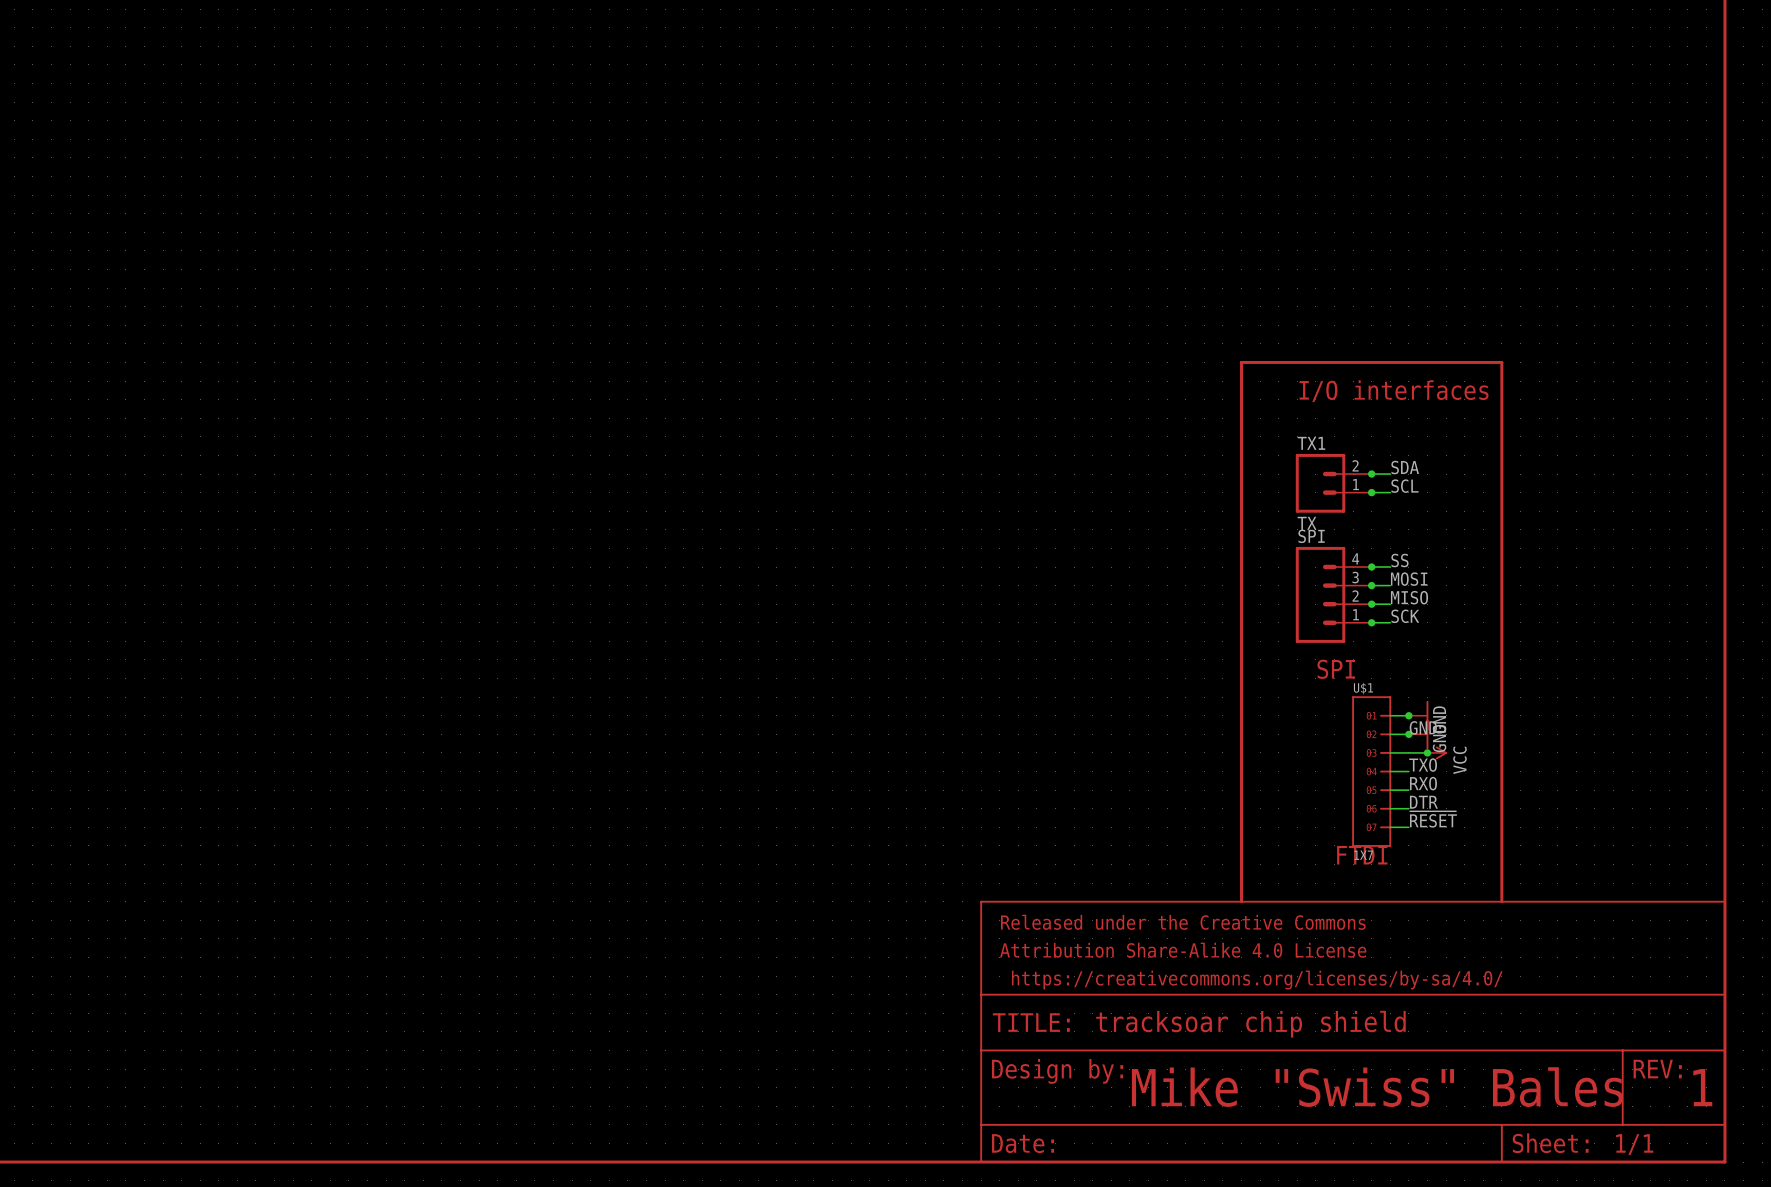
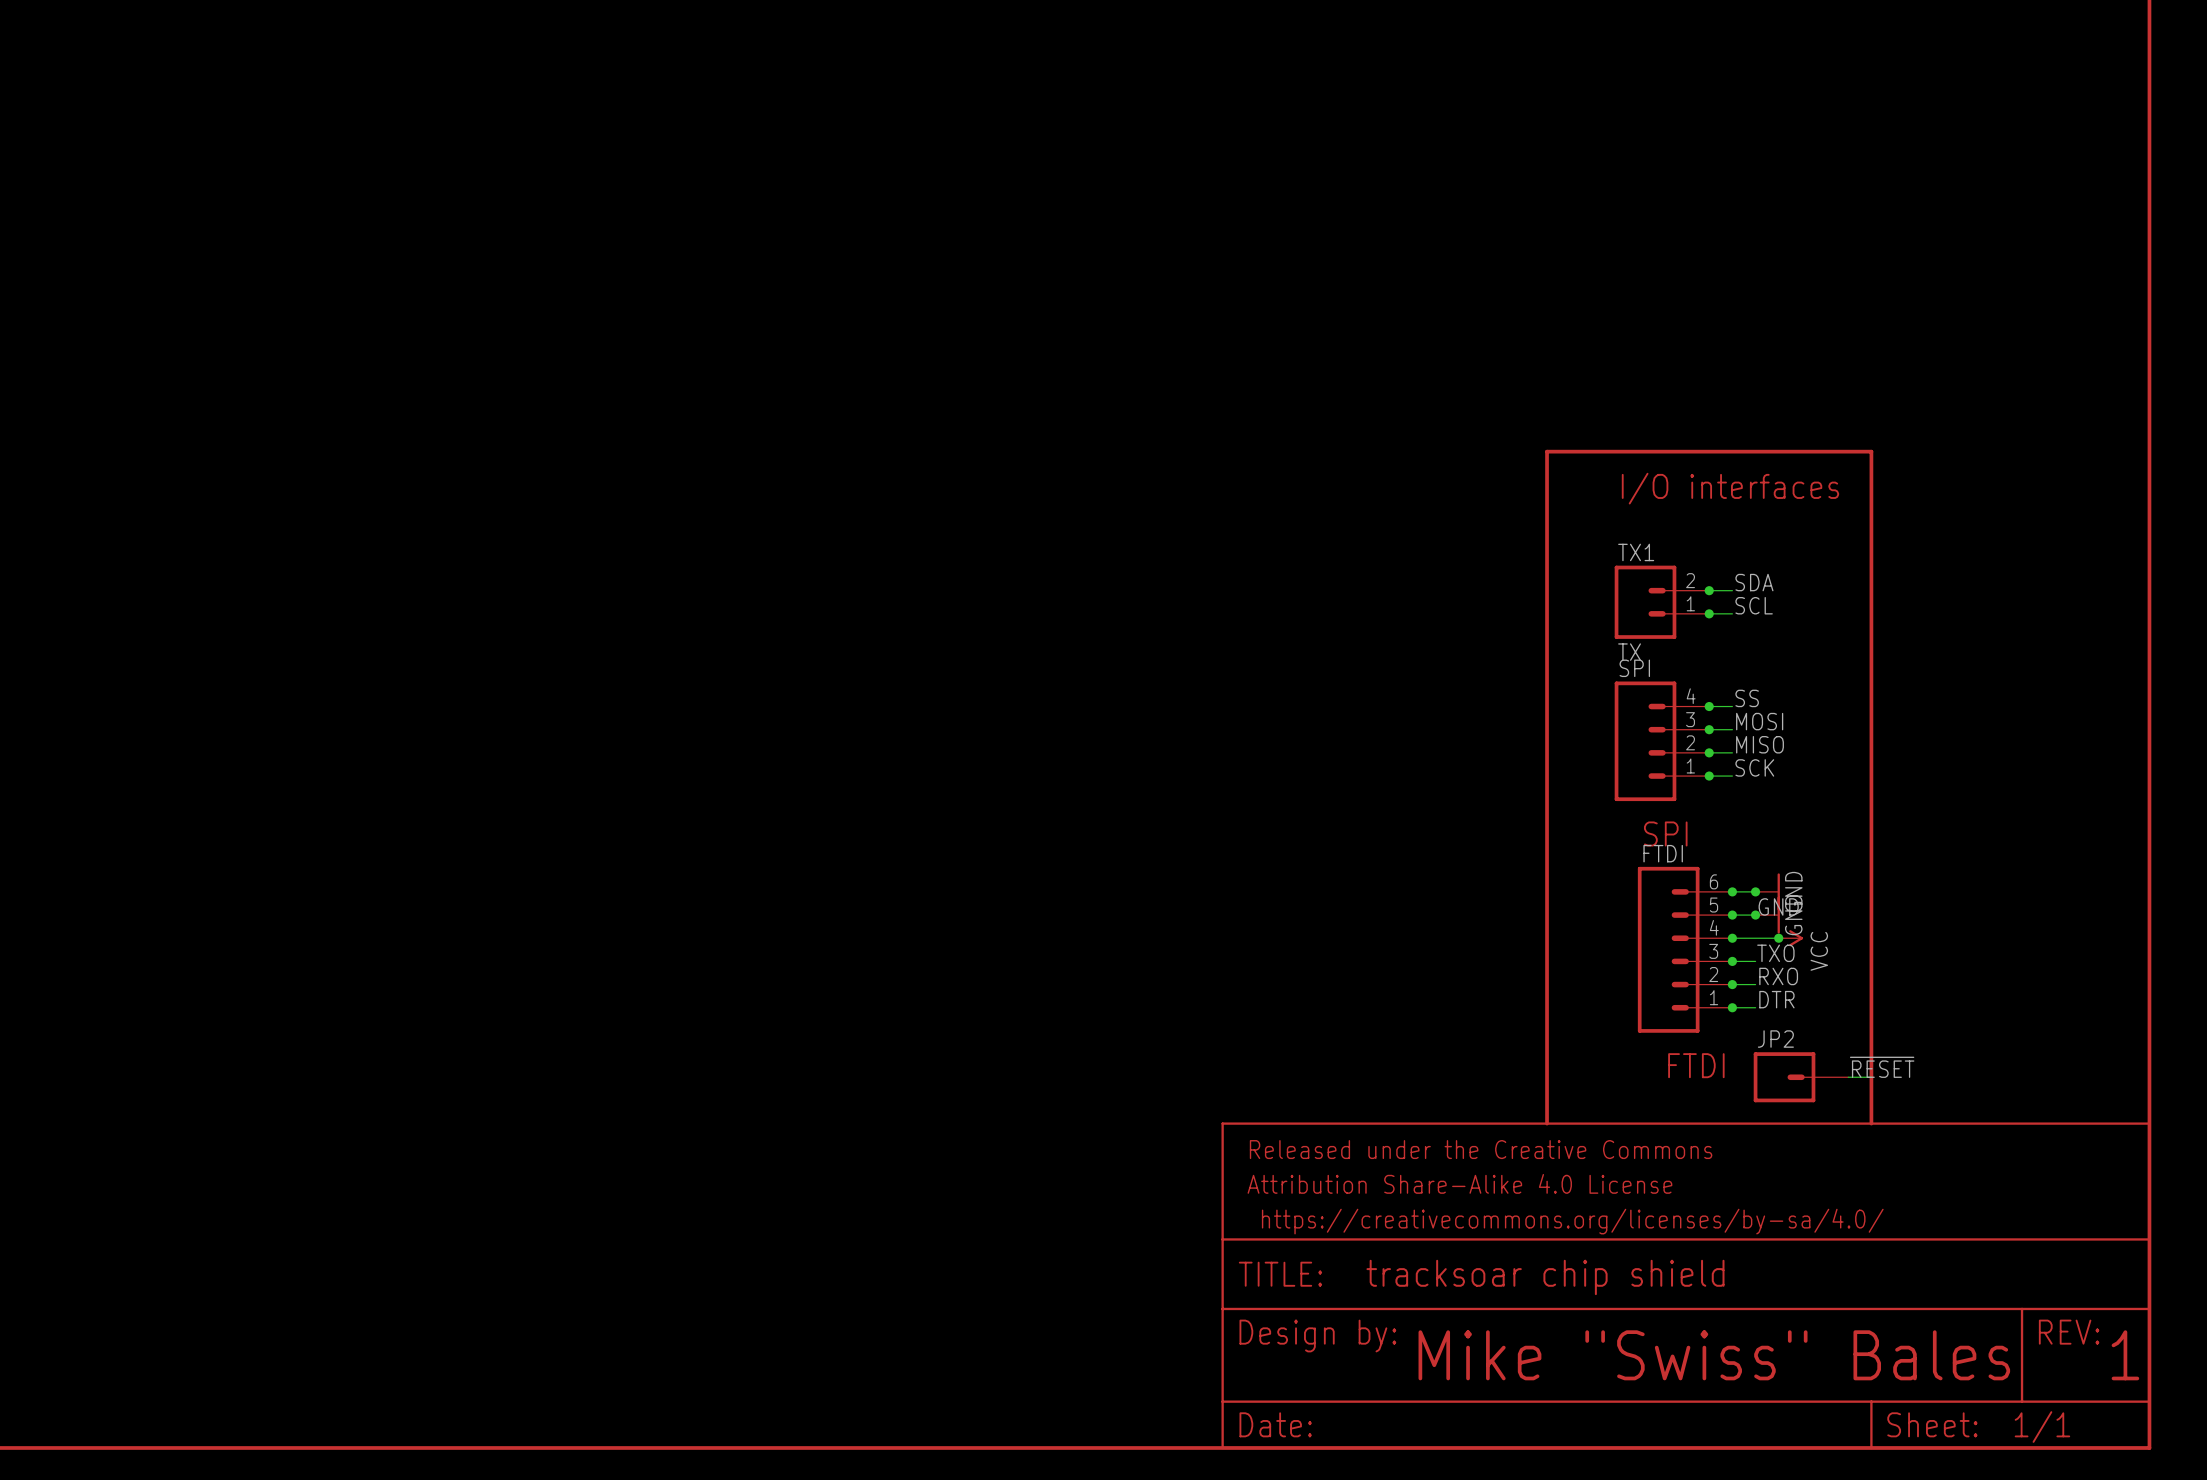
junction: none -> (1732, 891)
junction: none -> (1732, 915)
junction: none -> (1732, 938)
FTDI: none -> (1685, 949)
U$1: 1X7 (1371, 771) -> none
junction: none -> (1732, 961)
junction: none -> (1732, 984)
junction: none -> (1732, 1007)
label position: ~{RESET} (1433, 819) -> ~{RESET} (1882, 1067)
wire: (1390, 827) (1408, 827) -> (1848, 1077) (1871, 1077)
JP2: none -> (1800, 1077)

